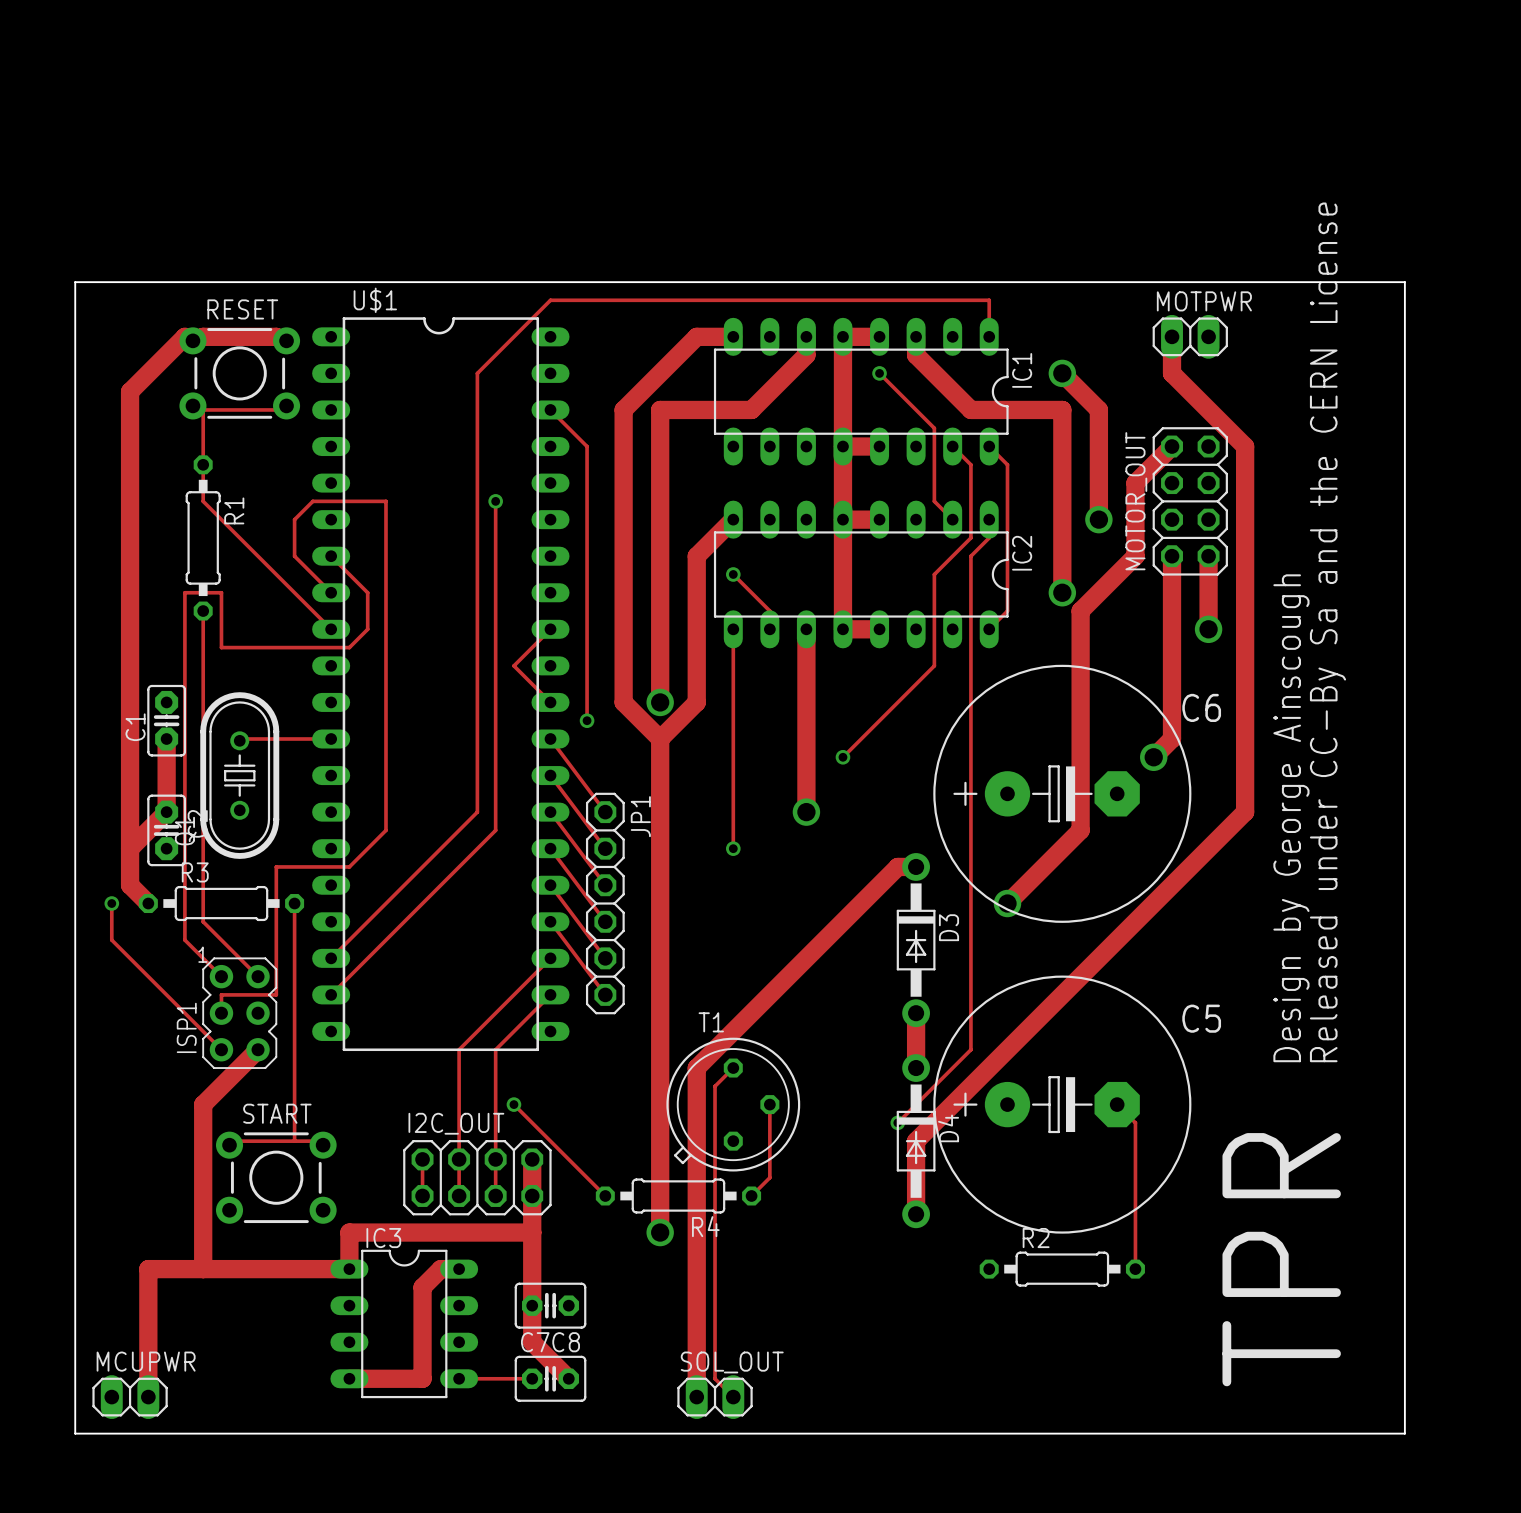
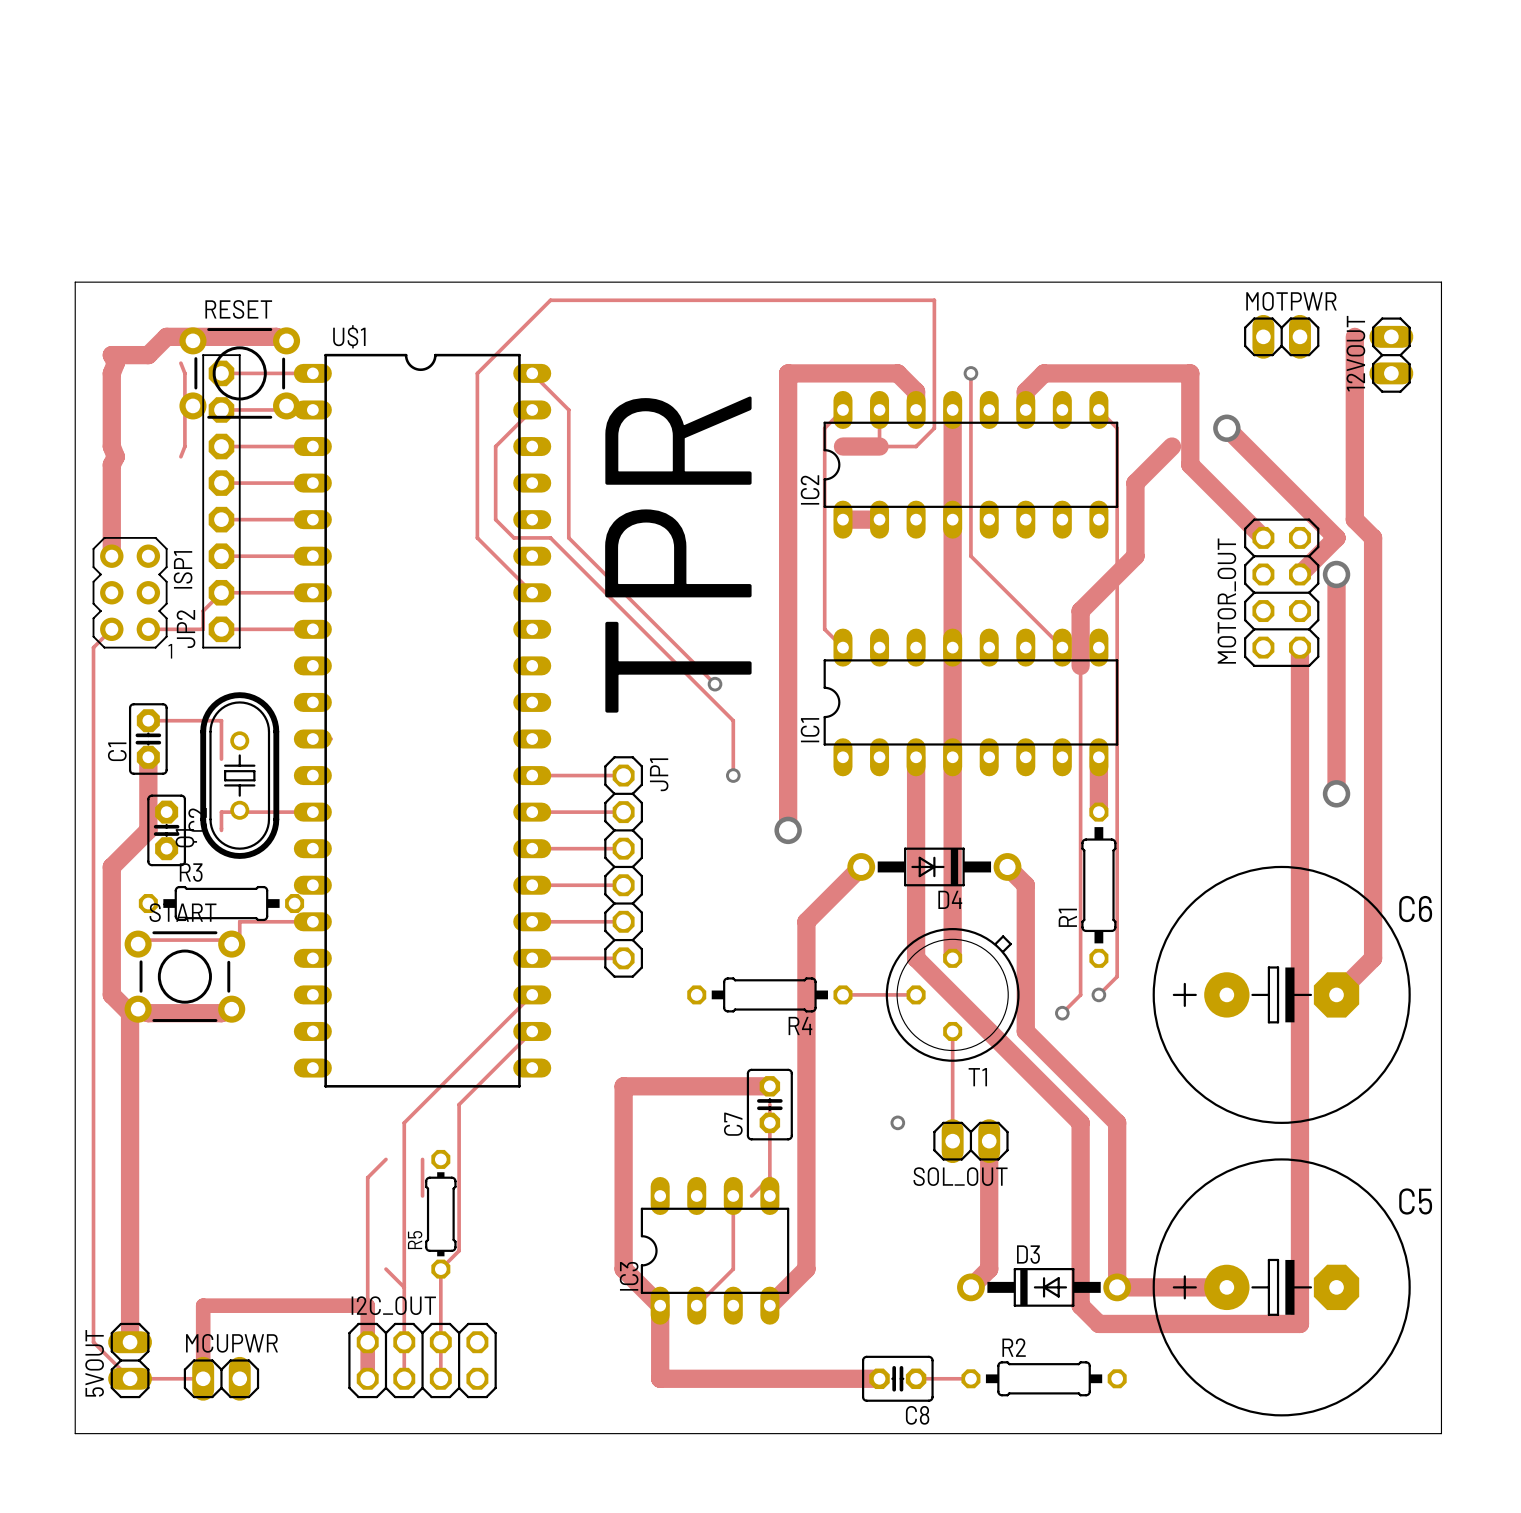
board edge: (1404, 282) (1404, 1433) -> (1404, 282) (1441, 282) (1441, 1433) (1404, 1433)
track: (934, 300) (989, 300) (989, 336) -> (934, 300) (934, 428) (916, 446) (879, 446) (879, 409)
track: (203, 336) (192, 340) (184, 336) (130, 391) (130, 885) (148, 903) -> (203, 336) (166, 336) (148, 355) (111, 355) (115, 363) (111, 373) (111, 446) (115, 456) (111, 464) (111, 556)
track: (733, 336) (696, 336) (623, 409) (623, 702) (660, 739) -> none
track: (806, 336) (806, 355) (751, 409) (660, 409) (660, 702) -> none
track: (879, 336) (842, 336) (842, 629) (879, 629) -> none
track: (916, 336) (916, 355) (970, 409) (1062, 409) (1062, 592) -> none
track: (1172, 336) (1172, 373) (1226, 428) -> none
MOTPWR position: (1190, 336) -> (1281, 336)
track: none -> (1354, 336) (1354, 519) (1373, 537) (1373, 958) (1336, 994)
12VOUT: none -> (1391, 355)
track: none -> (180, 363) (184, 373) (184, 446) (180, 456)
track: none -> (221, 373) (312, 373)
track: none -> (532, 373) (568, 409) (568, 537) (715, 684)
track: (879, 373) (934, 428) (934, 501) (952, 519) -> none
via: (879, 373) -> none
via: none -> (970, 373)
track: (1062, 373) (1098, 409) (1098, 519) -> none
via: (1062, 373) -> none
IC1 rotation: 0° (861, 391) -> 180° (970, 702)
IC1 position: (861, 391) -> (970, 702)
track: (203, 409) (203, 501) (331, 629) -> none
track: (203, 409) (221, 409) -> none
track: none -> (532, 409) (495, 446) (495, 501)
track: (550, 409) (587, 446) (587, 720) -> none
track: none -> (842, 409) (824, 428) (824, 629) (842, 647)
track: none -> (916, 409) (916, 391) (897, 373) (788, 373) (788, 830)
track: none -> (952, 409) (952, 958)
track: none -> (1025, 409) (1025, 391) (1044, 373) (1190, 373) (1190, 464) (1263, 537)
track: none -> (1098, 409) (1117, 428) (1117, 976) (1098, 994)
via: none -> (1226, 428)
track: none -> (221, 446) (312, 446)
track: (952, 446) (970, 464) -> (970, 373) (970, 464)
track: (989, 446) (1007, 464) (1007, 611) (989, 629) -> none
track: (1245, 446) (1245, 812) (916, 1141) (916, 1214) -> (1245, 446) (1336, 537) (1299, 574)
track: none -> (221, 483) (312, 483)
JP2: none -> (221, 501)
via: (495, 501) -> none
MOTOR_OUT position: (1190, 501) -> (1281, 592)
R1 name position: R1 (234, 510) -> R1 (1067, 917)
track: none -> (221, 519) (312, 519)
track: (495, 519) (495, 830) (331, 994) -> none
track: (733, 519) (696, 556) (696, 702) (660, 739) -> none
track: (989, 519) (989, 537) (970, 556) (970, 1049) (897, 1122) -> none
via: (1098, 519) -> none
R1 position: (203, 537) -> (1098, 885)
track: (477, 537) (477, 812) (331, 958) -> (477, 537) (532, 592)
text: none -> TPR (678, 554)
track: (970, 537) (934, 574) (934, 665) (842, 757) -> (970, 537) (970, 556) (1062, 647)
track: none -> (221, 556) (312, 556)
track: (331, 556) (367, 592) (367, 629) (349, 647) (221, 647) (221, 592) (184, 592) (184, 940) (221, 976) -> none
track: (1172, 556) (1172, 739) (1153, 757) -> none
track: (1208, 556) (1208, 629) -> none
track: (733, 574) (769, 611) (769, 629) -> none
via: (733, 574) -> none
IC2 rotation: 0° (861, 574) -> 180° (970, 464)
track: none -> (1336, 574) (1336, 793)
via: none -> (1336, 574)
track: none -> (312, 592) (221, 592) (203, 611)
track: (331, 592) (294, 556) (294, 519) (312, 501) (385, 501) (385, 830) (349, 866) (276, 866) (276, 994) (221, 994) (221, 1013) -> none
via: (1062, 592) -> none
track: none -> (111, 629) (93, 647) (93, 1342) (130, 1378) (203, 1378) (203, 1305) (367, 1305) (367, 1378)
track: (203, 629) (203, 921) (258, 976) -> (203, 629) (148, 629)
track: none -> (221, 629) (312, 629)
track: (550, 629) (513, 665) (550, 702) -> none
track: (733, 629) (733, 720) -> (495, 519) (513, 537) (550, 537) (733, 720)
track: (806, 629) (806, 812) -> none
via: (1208, 629) -> none
text: Released under CC-By Sa and the CERN License (1328, 632) -> none
track: none -> (1299, 647) (1299, 1323) (1098, 1323) (1080, 1305) (1080, 1122) (916, 958) (916, 757)
track width: thick (1080, 665) (1080, 830) -> thin (1080, 665) (1080, 830)
U$1 position: (440, 684) -> (422, 720)
via: none -> (715, 684)
via: (660, 702) -> none
track: none -> (148, 720) (221, 720) (221, 759)
C1 position: (166, 720) -> (148, 739)
via: (587, 720) -> none
track: (166, 739) (166, 812) (148, 830) -> (148, 757) (148, 830)
track: (312, 739) (239, 739) (239, 740) -> none
track: (550, 739) (605, 812) -> none
track: (660, 739) (660, 1232) -> none
via: (842, 757) -> none
via: (1153, 757) -> none
track: none -> (532, 775) (623, 775)
track: (550, 775) (605, 848) -> none
track: (733, 775) (733, 848) -> none
via: none -> (733, 775)
C6 position: (1062, 793) -> (1281, 994)
via: none -> (1336, 793)
track: none -> (312, 812) (221, 812) (221, 830)
track: none -> (532, 812) (623, 812)
track: (550, 812) (605, 885) -> none
via position: (806, 812) -> (788, 830)
text: Design by George Ainscough (1291, 818) -> none
track: (1080, 830) (1007, 903) -> (1080, 830) (1080, 994) (1062, 1013)
track: none -> (130, 848) (111, 866) (111, 903)
track: none -> (532, 848) (623, 848)
track: (550, 848) (605, 921) -> none
via: (733, 848) -> none
track: none -> (861, 866) (806, 921) (806, 1269) (769, 1305)
track: (916, 866) (897, 866) (696, 1068) (696, 1397) -> none
track: none -> (1007, 866) (1025, 885) (1025, 1031) (1117, 1122) (1117, 1287) (1226, 1287)
track: none -> (532, 885) (623, 885)
track: (550, 885) (605, 958) -> none
track width: thin (111, 903) (111, 940) -> thick (111, 903) (111, 940)
via: (111, 903) -> none
track: (294, 903) (294, 1141) -> none
JP1 position: (605, 903) -> (623, 866)
via: (1007, 903) -> none
track: none -> (312, 921) (239, 921) (239, 940) (231, 944) (221, 940) (148, 940) (138, 944)
track: none -> (532, 921) (623, 921)
track: (550, 921) (605, 994) -> none
track: (111, 940) (221, 1049) -> (111, 940) (111, 994) (130, 1013)
D3 rotation: 0° (916, 940) -> 90° counterclockwise (1044, 1287)
D3 position: (916, 940) -> (1044, 1287)
ISP1 text position: 1 (202, 954) -> 1 (170, 651)
track: none -> (532, 958) (623, 958)
track: (550, 958) (459, 1049) (459, 1104) -> (532, 1031) (459, 1104)
track: none -> (532, 994) (404, 1122) (404, 1378)
track: (550, 994) (495, 1049) (495, 1195) -> none
track: none -> (842, 994) (916, 994)
via: none -> (1098, 994)
track: none -> (231, 1009) (221, 1013) (148, 1013) (138, 1009) (130, 1013)
track: none -> (130, 1013) (130, 1342)
ISP1 position: (239, 1013) -> (130, 592)
track: (916, 1013) (916, 1068) -> (1098, 757) (1098, 812)
via: none -> (1062, 1013)
ISP1 name position: ISP1 (186, 1027) -> ISP1 (183, 569)
track: none -> (952, 1031) (952, 1141)
track: (258, 1049) (203, 1104) (203, 1269) -> none
track: (733, 1068) (715, 1086) (715, 1378) (733, 1397) -> none
track: none -> (769, 1086) (623, 1086) (623, 1269) (660, 1305) (660, 1378) (879, 1378)
track: (513, 1104) (605, 1195) -> none
via: (513, 1104) -> none
T1 rotation: 0° (733, 1104) -> 180° (952, 994)
T1 position: (733, 1104) -> (952, 994)
C5 position: (1062, 1104) -> (1281, 1287)
track: (1117, 1104) (1135, 1122) (1135, 1269) -> none
D4 rotation: 0° (916, 1141) -> 90° clockwise (934, 866)
D4 position: (916, 1141) -> (934, 866)
SOL_OUT: none -> (970, 1141)
track: none -> (989, 1141) (989, 1269) (970, 1287)
track: (229, 1145) (239, 1141) (312, 1141) (323, 1145) -> none
track: none -> (385, 1159) (367, 1177) (367, 1342)
track: (532, 1159) (532, 1342) (568, 1378) -> none
START position: (276, 1177) -> (184, 976)
I2C_OUT position: (477, 1177) -> (422, 1360)
track: none -> (459, 1195) (459, 1250) (440, 1269) (440, 1378)
R4 position: (678, 1195) -> (769, 994)
track: none -> (733, 1195) (733, 1269) (696, 1305)
R5: none -> (440, 1214)
track: (532, 1232) (349, 1232) (349, 1269) (148, 1269) (148, 1397) -> none
via: (660, 1232) -> none
text: TPR (1281, 1259) -> none
track: none -> (385, 1269) (404, 1287)
track: (459, 1269) (440, 1269) (422, 1287) (422, 1378) (349, 1378) -> none
R2 position: (1062, 1269) -> (1044, 1378)
C8 position: (550, 1305) -> (897, 1378)
IC3 rotation: 0° (404, 1323) -> 90° counterclockwise (715, 1250)
IC3 position: (404, 1323) -> (715, 1250)
C7 name position: C7 (535, 1342) -> C7 (733, 1124)
5VOUT: none -> (130, 1360)
track: (459, 1378) (532, 1378) -> none
C7 rotation: 0° (550, 1378) -> 90° clockwise (769, 1104)
C7 position: (550, 1378) -> (769, 1104)
track: none -> (916, 1378) (970, 1378)
MCUPWR position: (130, 1397) -> (221, 1378)
SOL_OUT: (715, 1397) -> none

